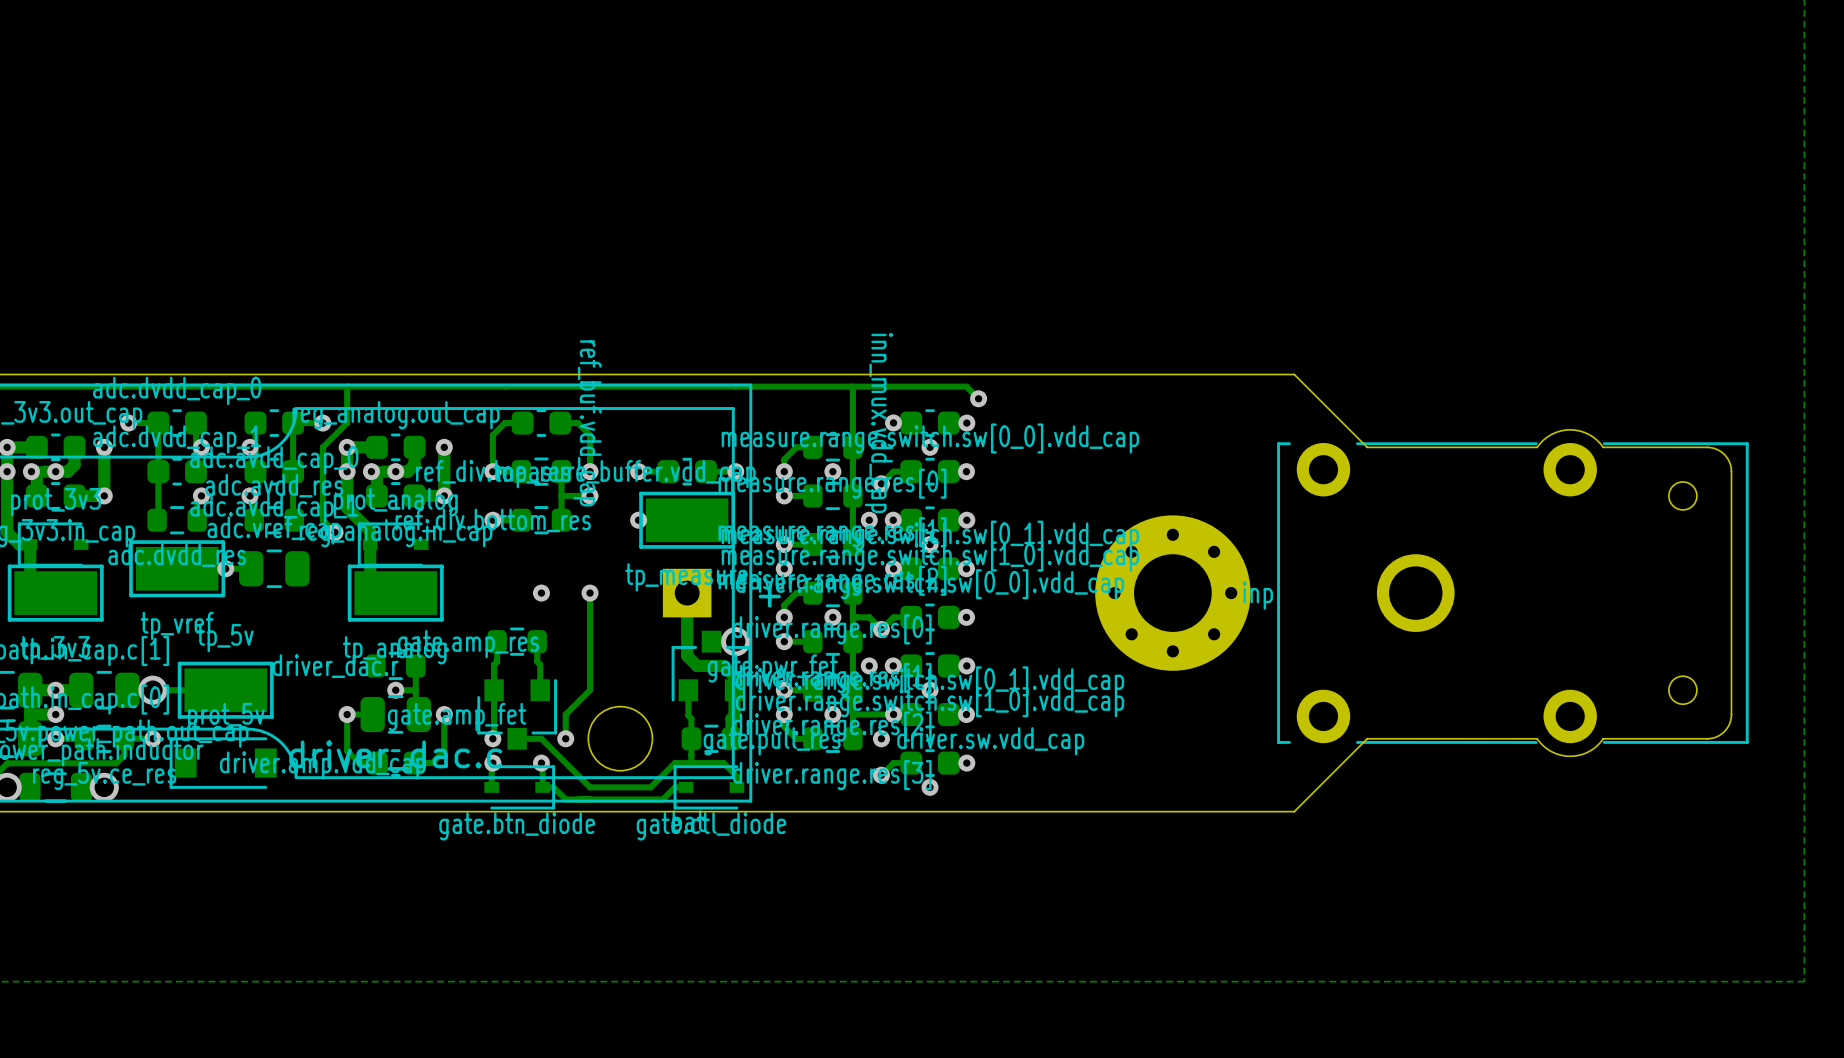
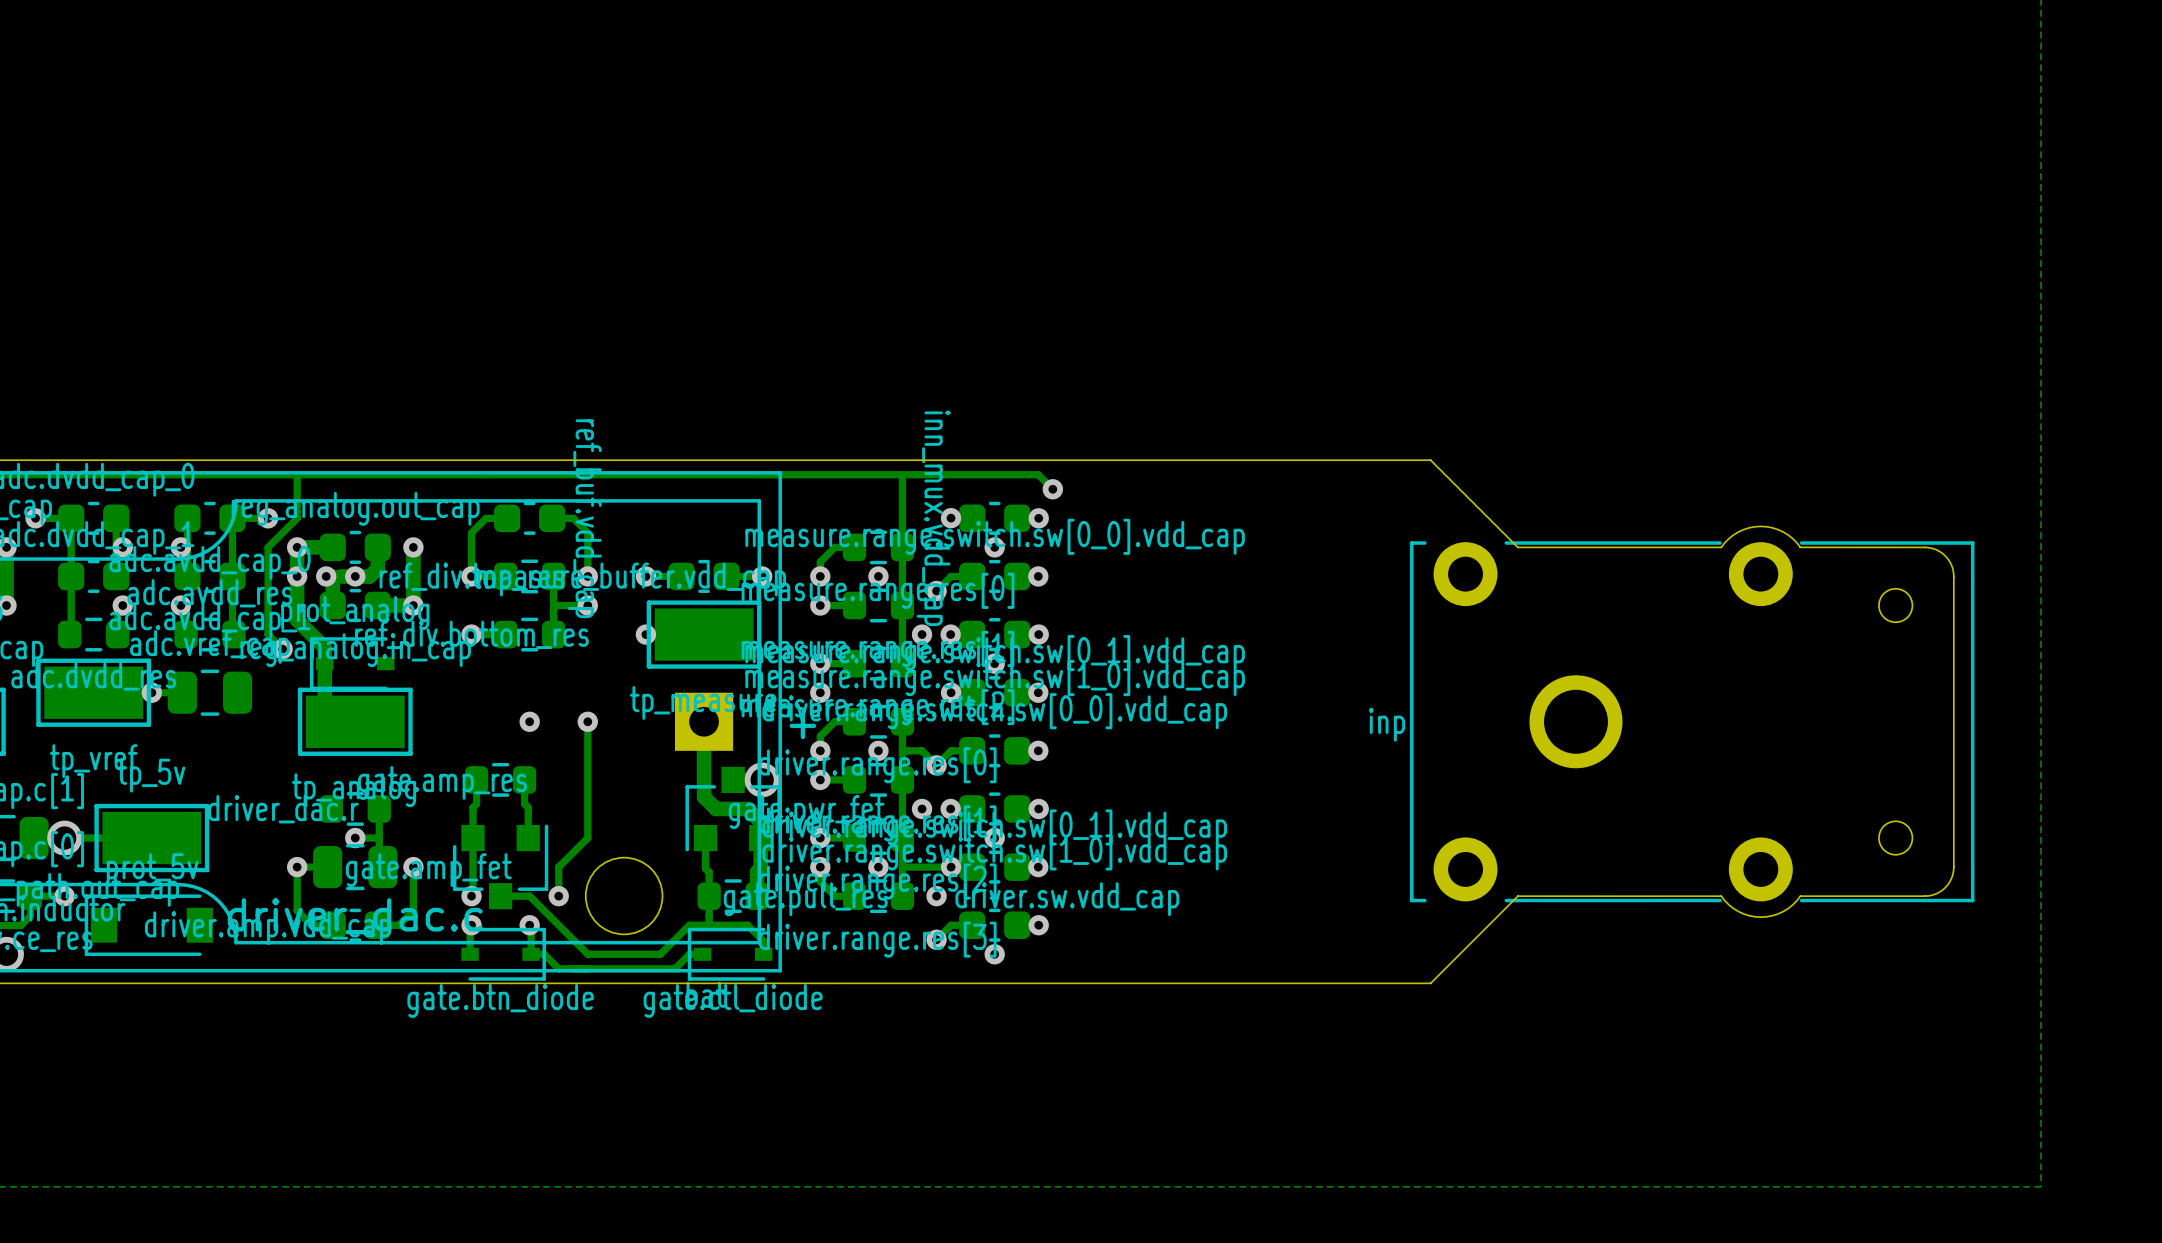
part: (1172, 593) -> none

